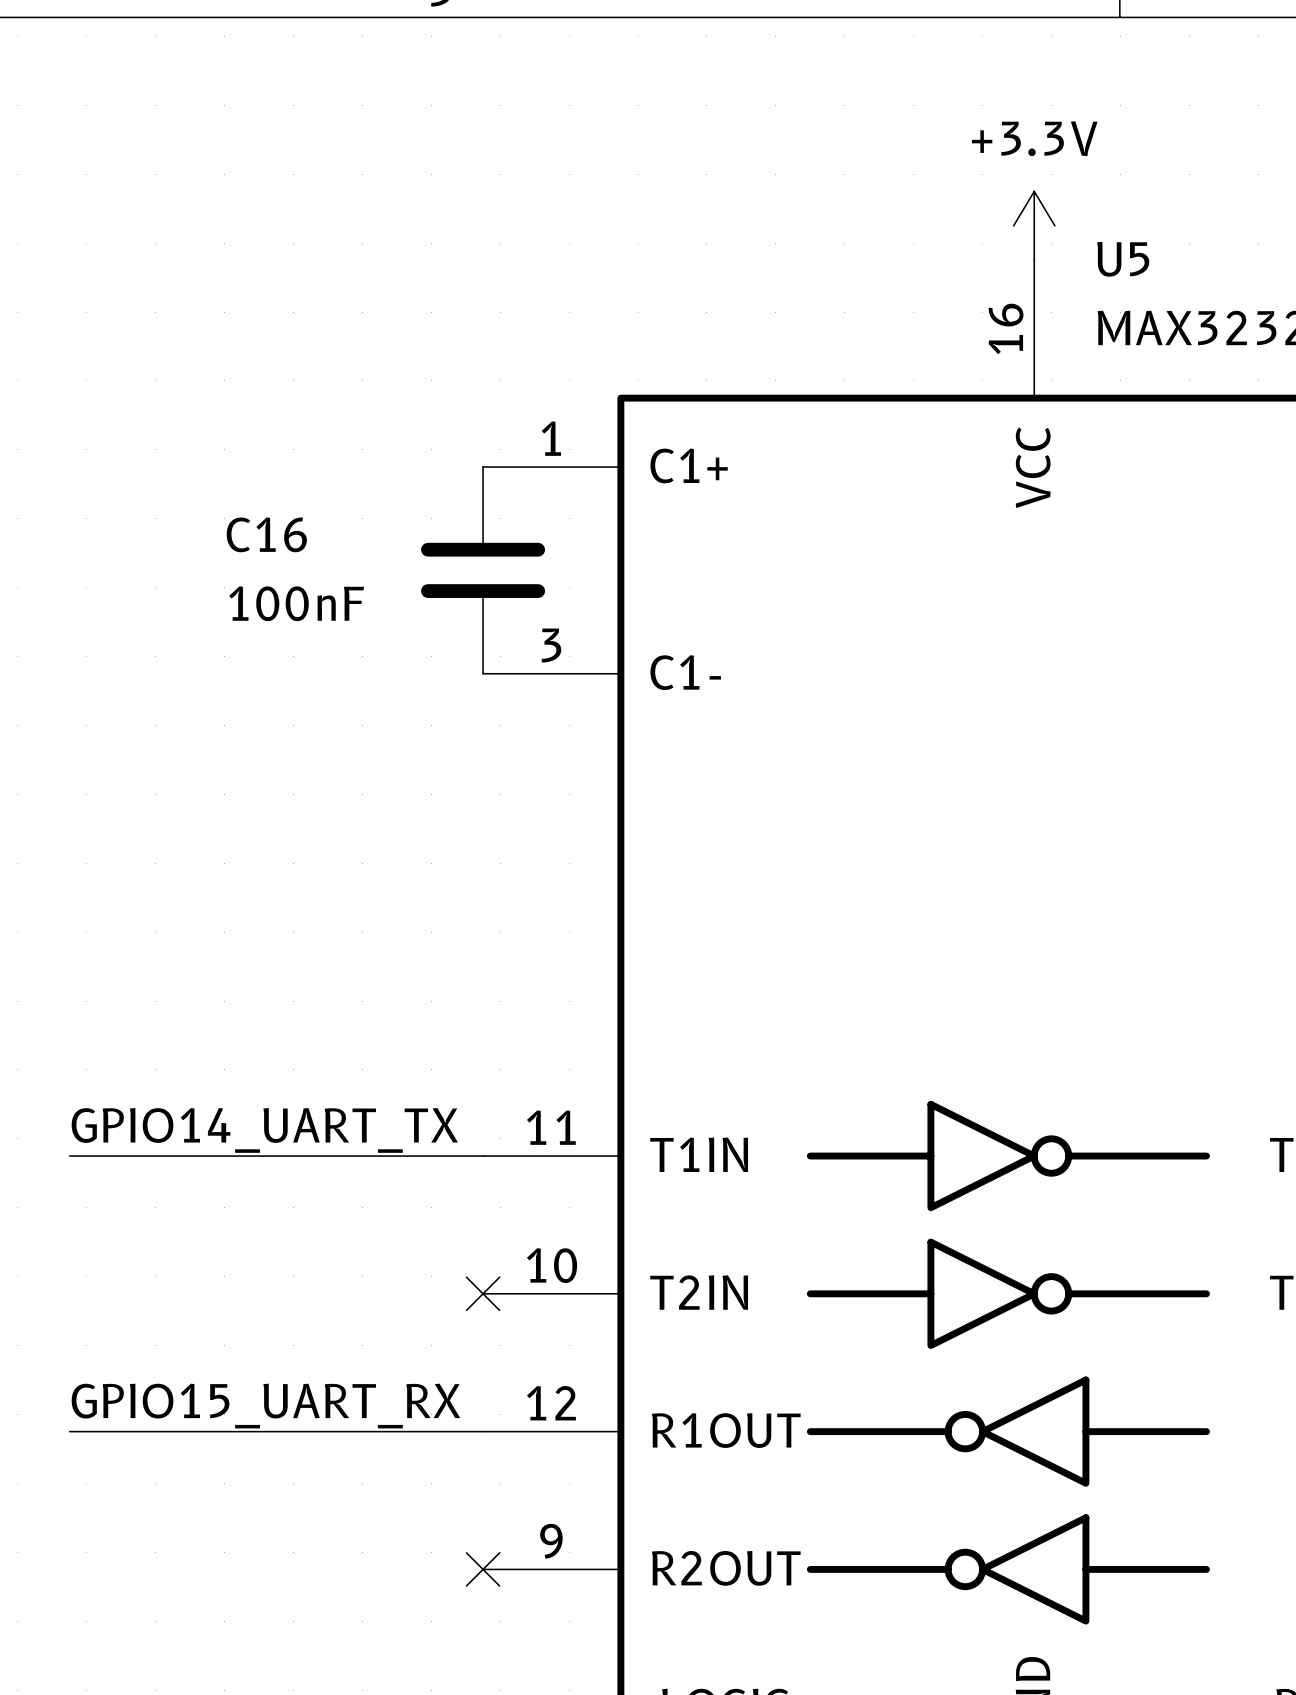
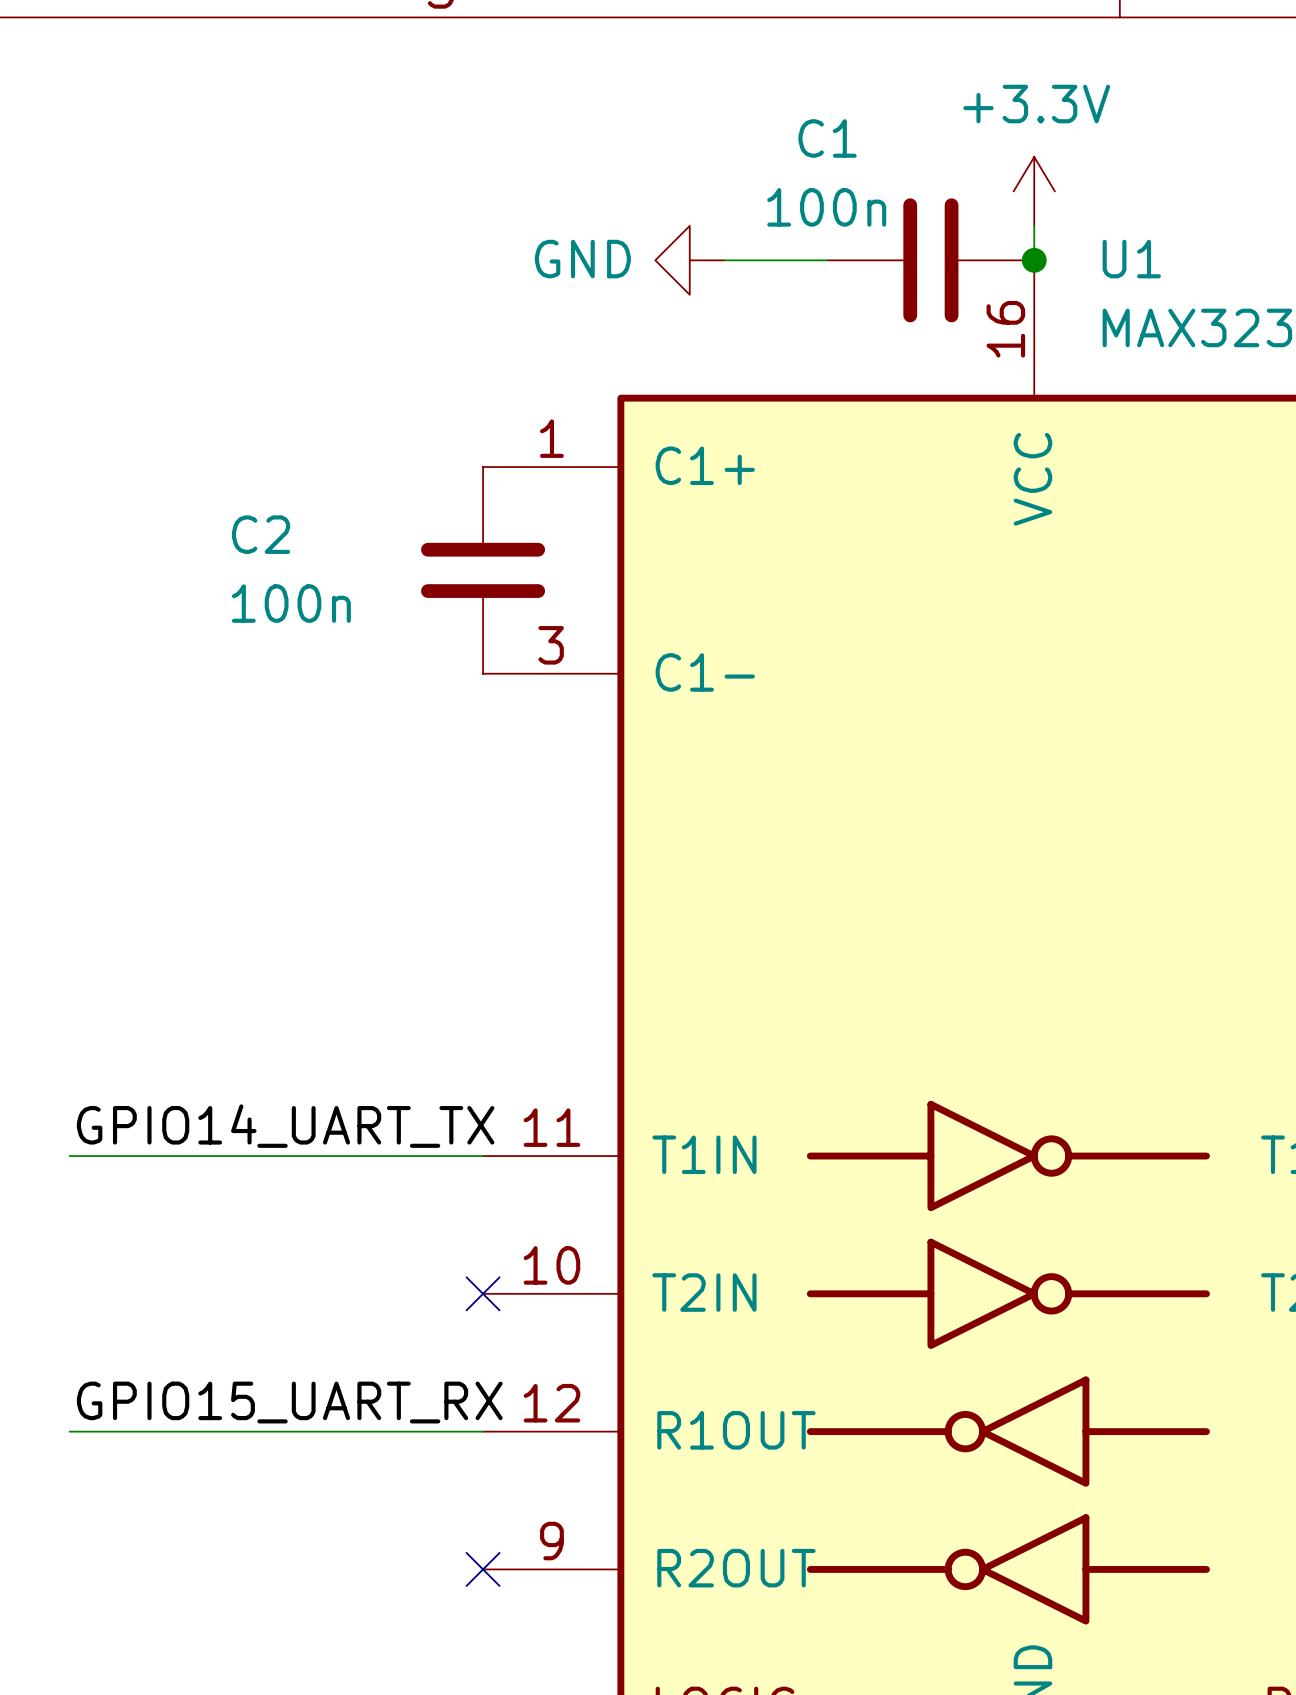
power symbol position: +3.3V (1034, 225) -> +3.3V (1034, 191)
U5 name: U5 (1123, 259) -> U1 (1131, 259)
power symbol: none -> GND (689, 260)
wire: none -> (724, 260) (827, 260)
C1: none -> 100n (930, 260)
junction: none -> (1034, 260)
C16 name: C16 (266, 534) -> C2 (261, 534)
C16 value: 100nF (296, 603) -> 100n (291, 603)

